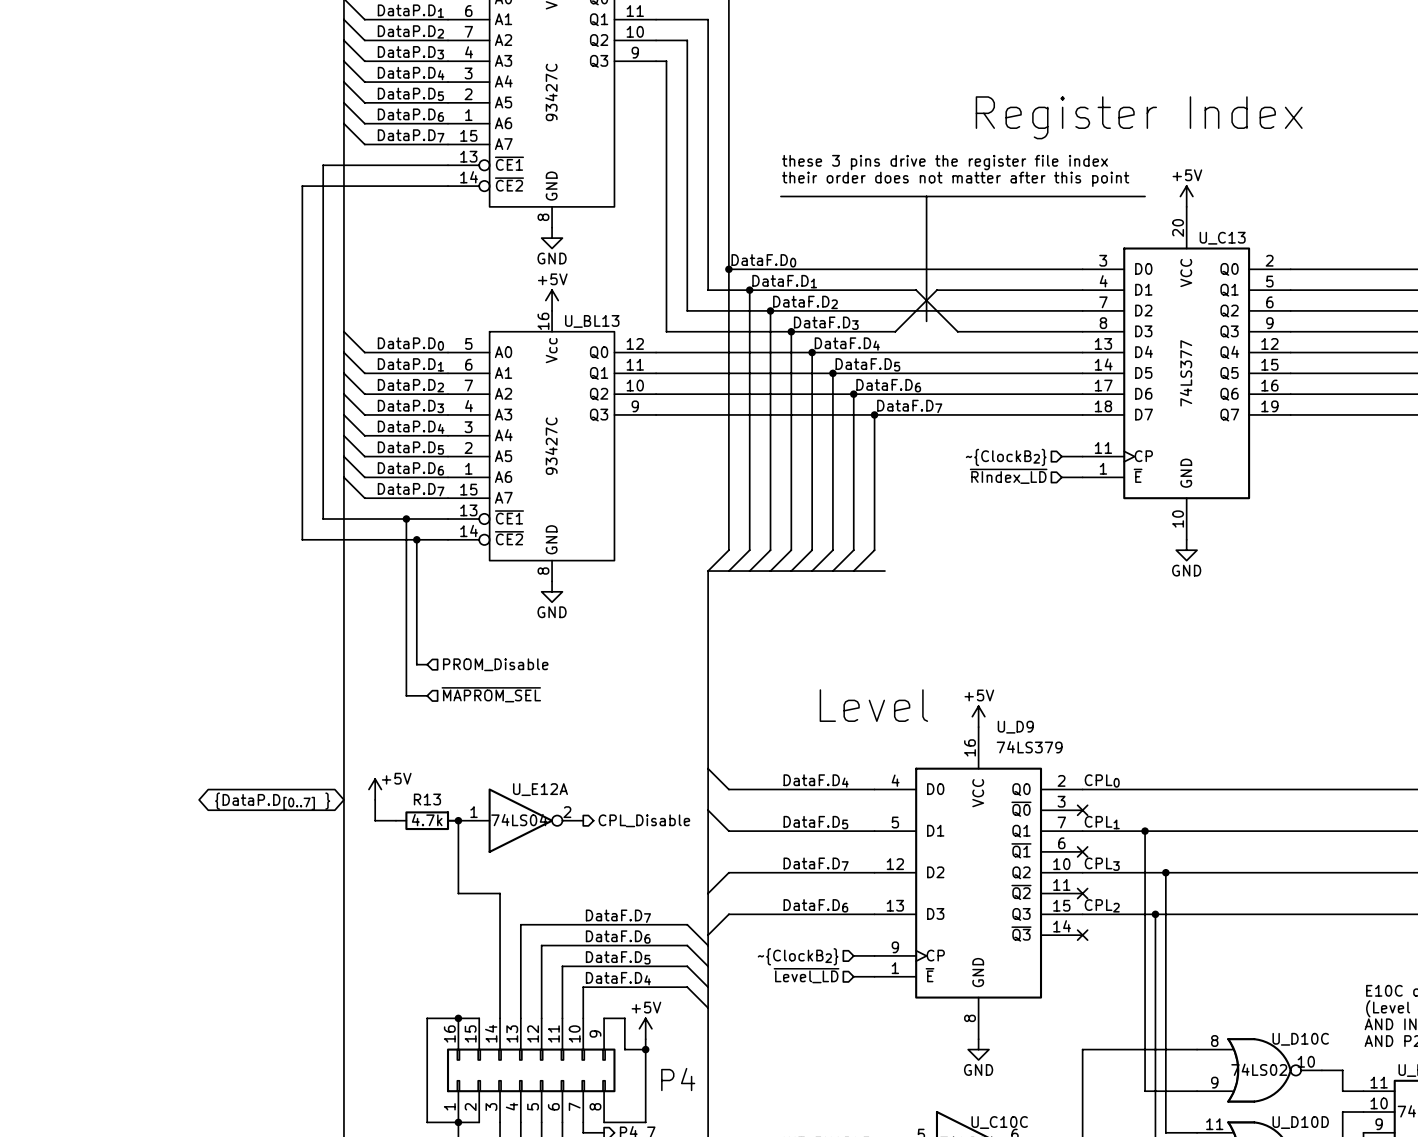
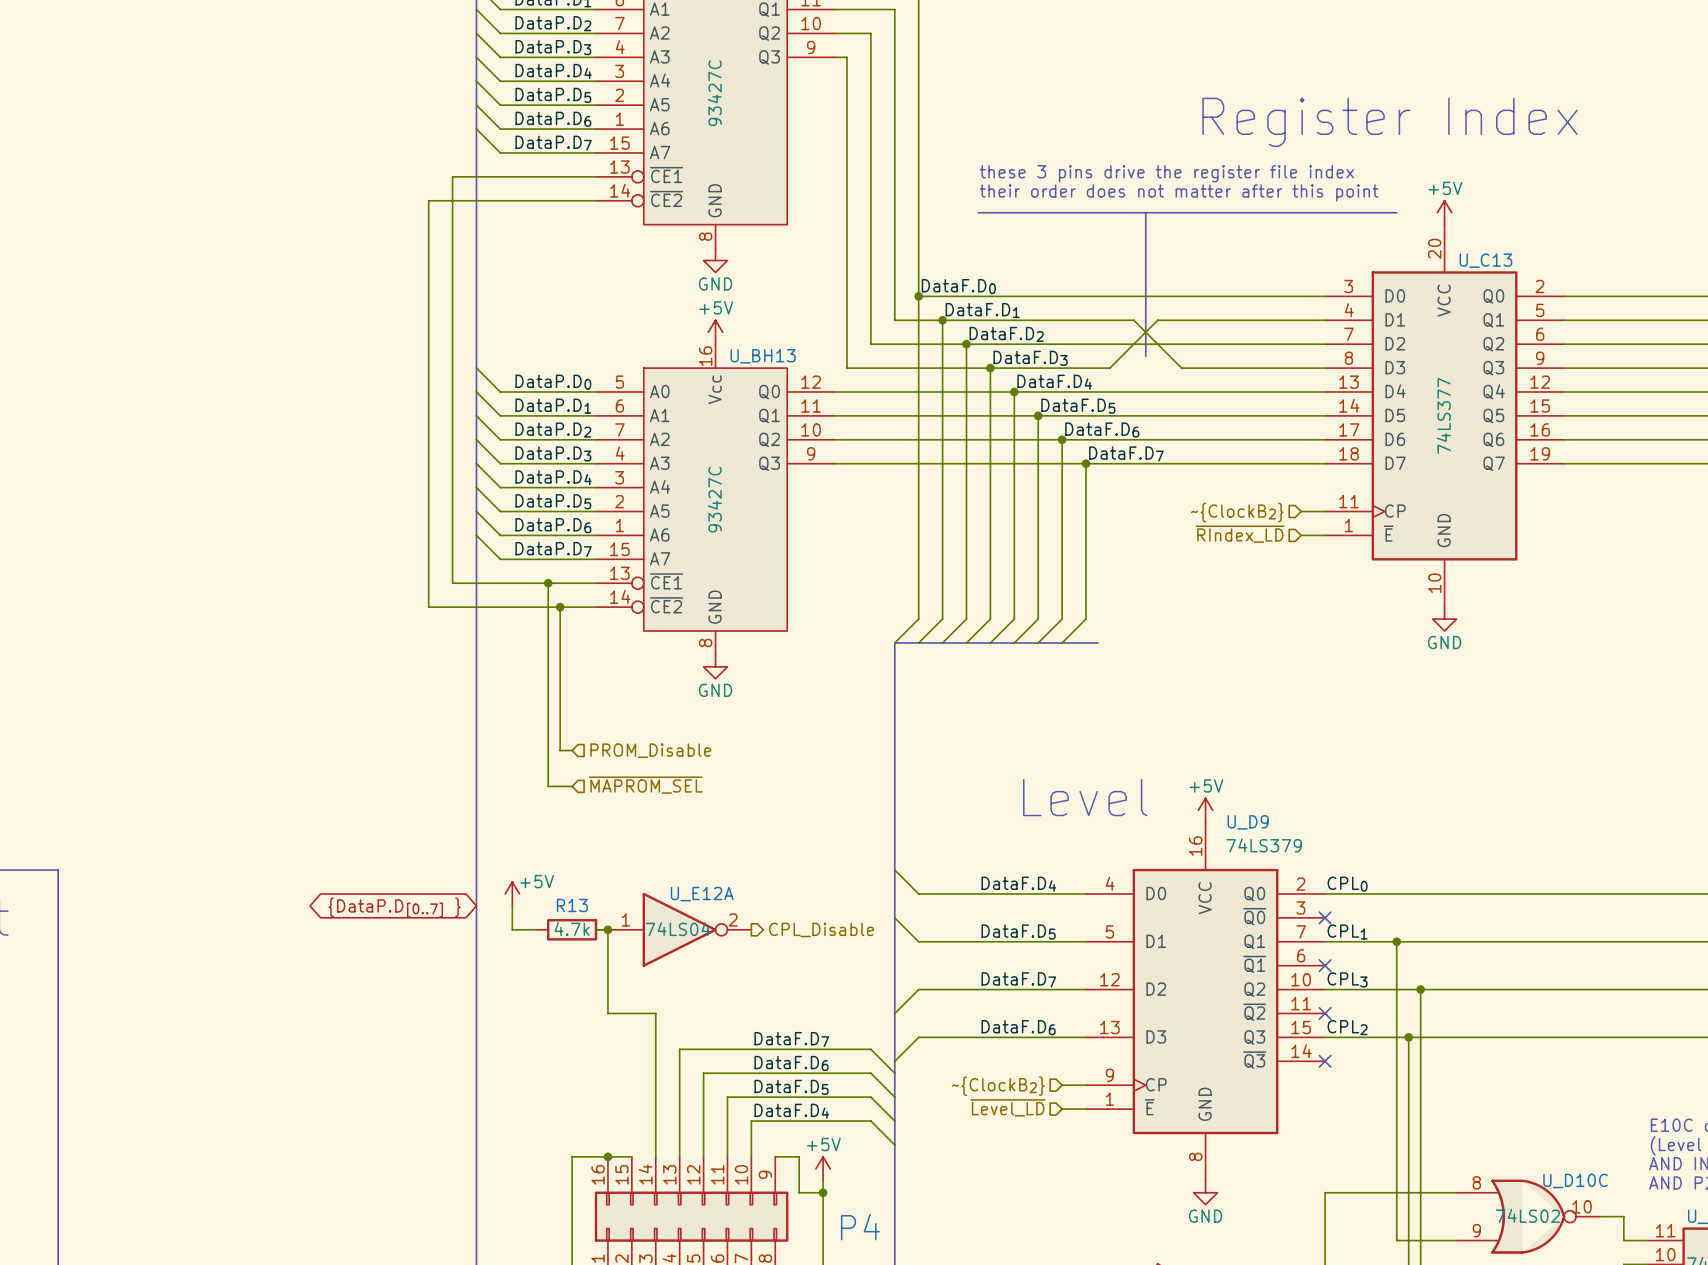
U_BL13 name: U_BL13 (592, 321) -> U_BH13 (763, 356)

